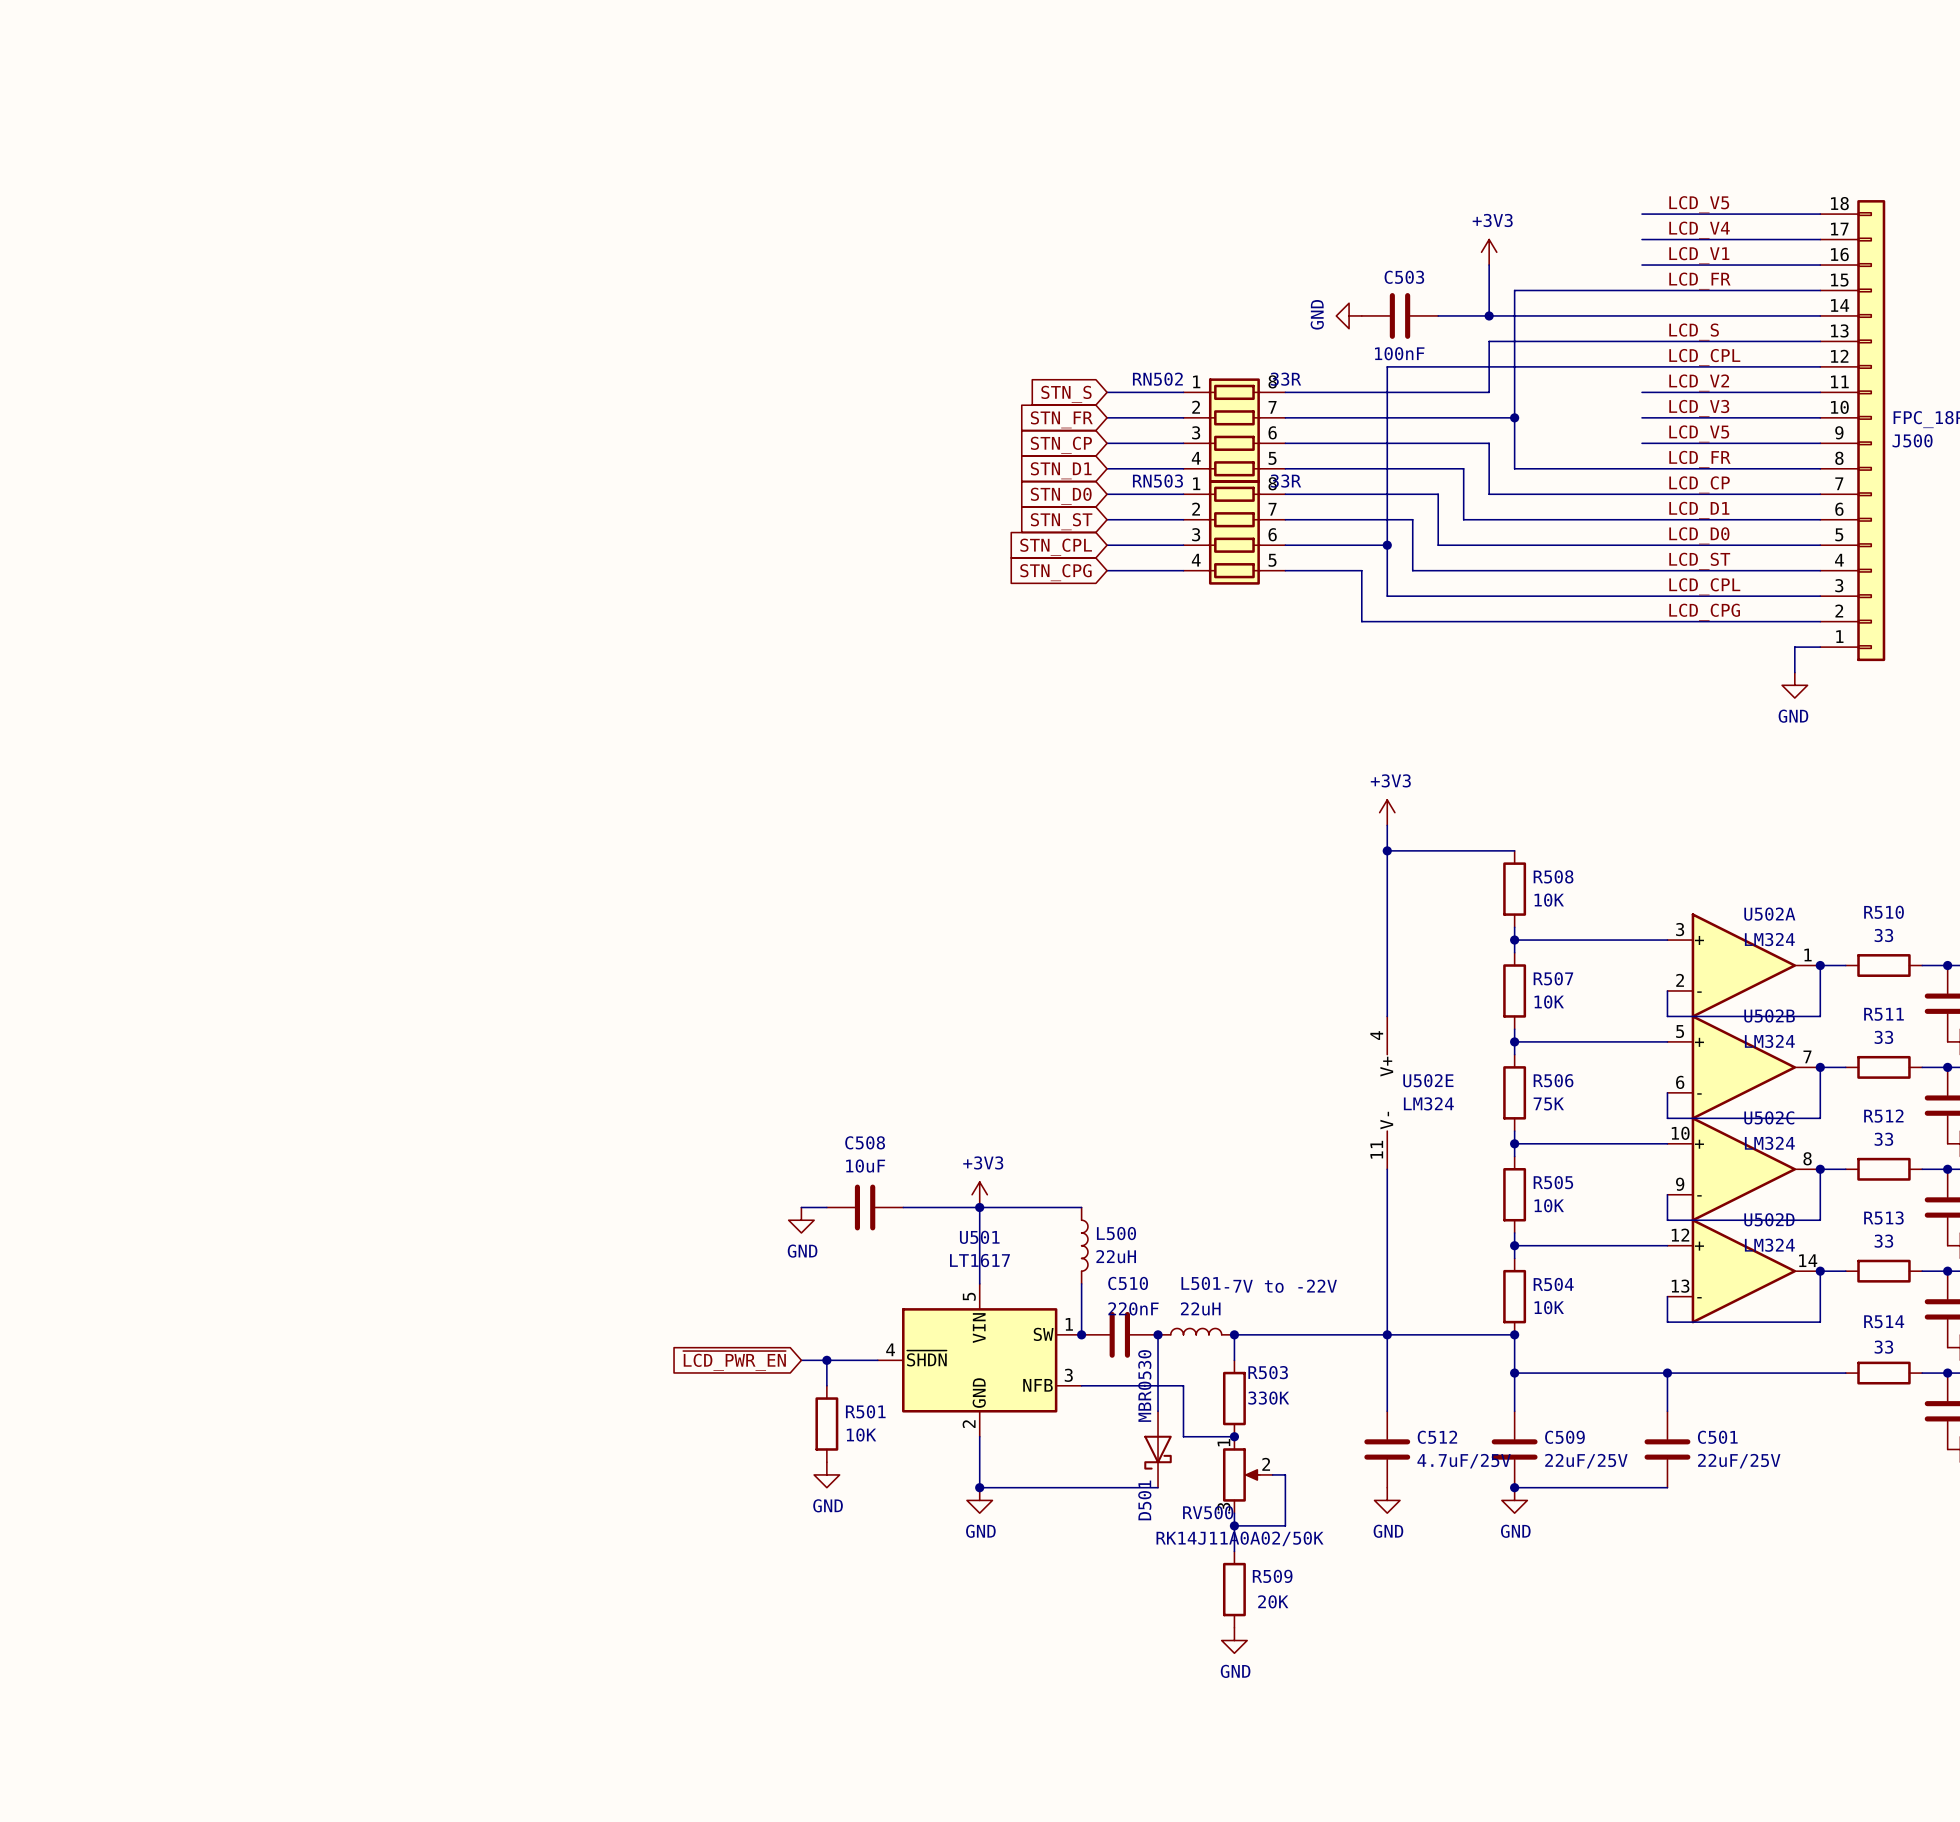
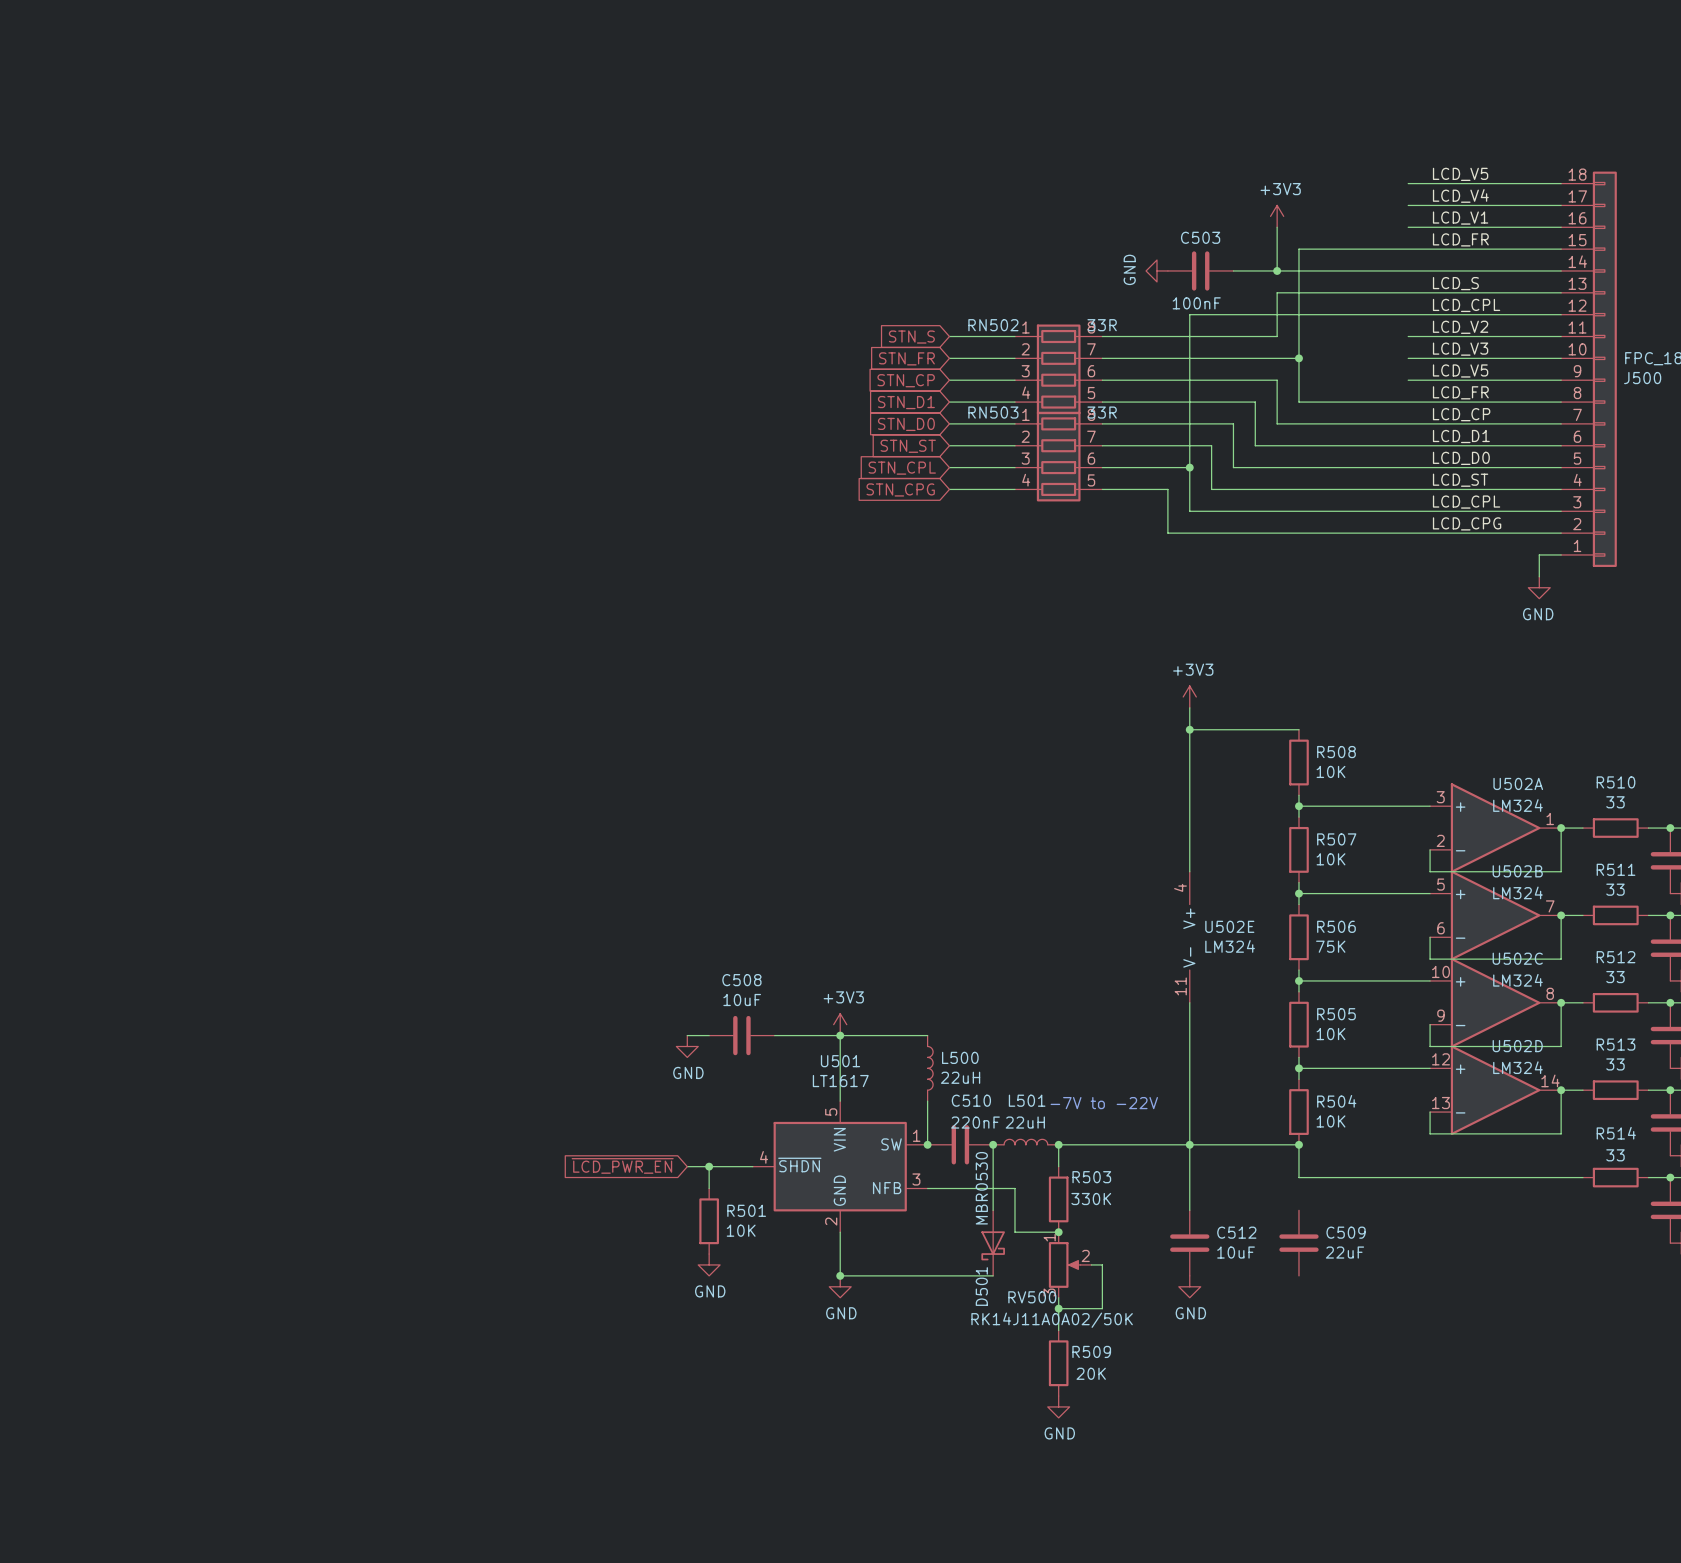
wire: (1514, 1373) (1514, 1411) -> none
junction: (1514, 1373) -> none
wire: (1667, 1373) (1667, 1411) -> none
junction: (1667, 1373) -> none
C501: 22uF/25V (1667, 1449) -> none
C512 value: 4.7uF/25V (1464, 1461) -> 10uF (1236, 1252)
C509 value: 22uF/25V (1586, 1461) -> 22uF (1345, 1252)
wire: (1514, 1487) (1667, 1487) -> none
junction: (1514, 1487) -> none
power symbol: GND (1514, 1500) -> none

